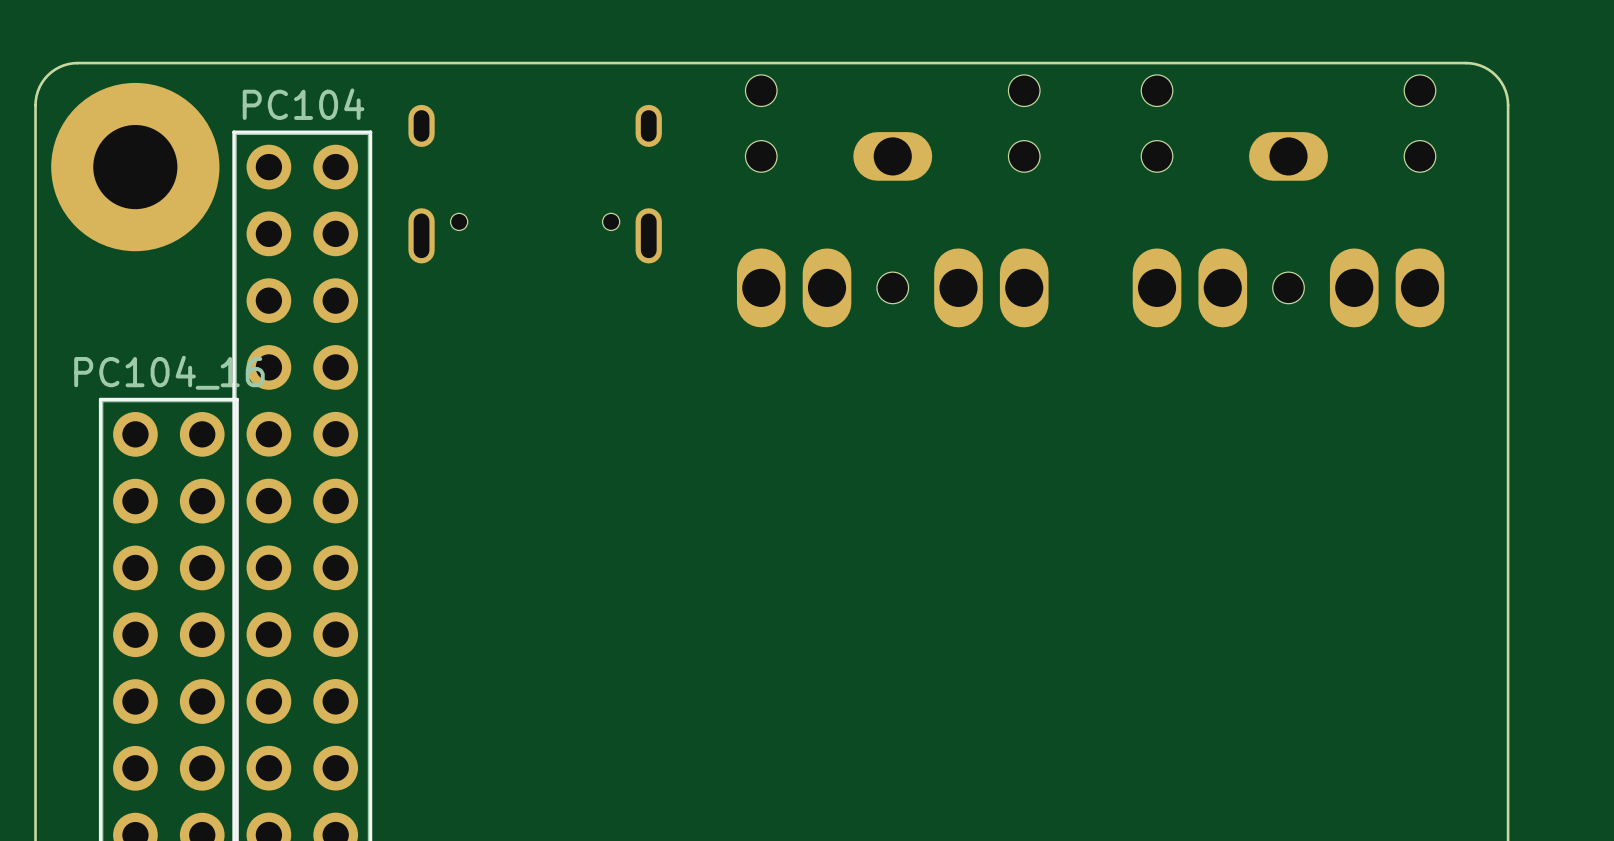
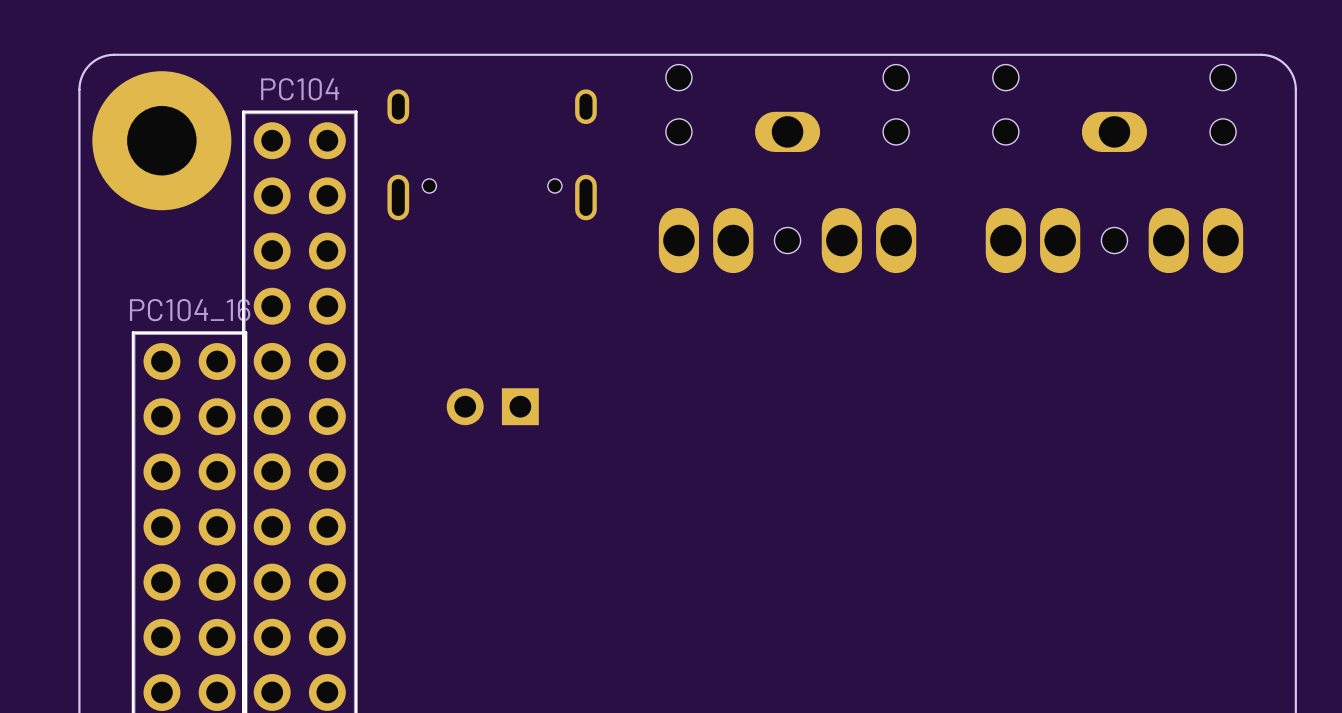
part: none -> (492, 406)

